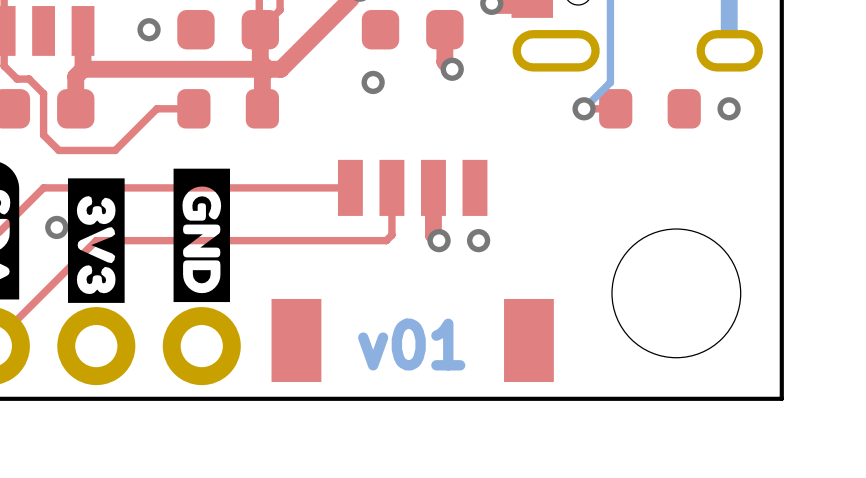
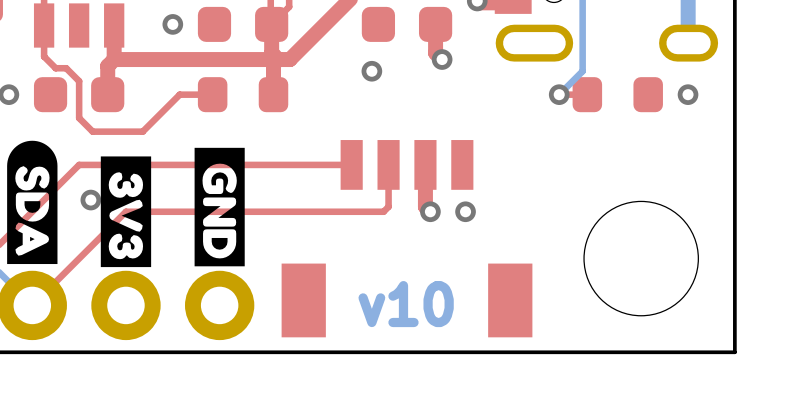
text: v01 (411, 344) -> v10 (406, 304)

